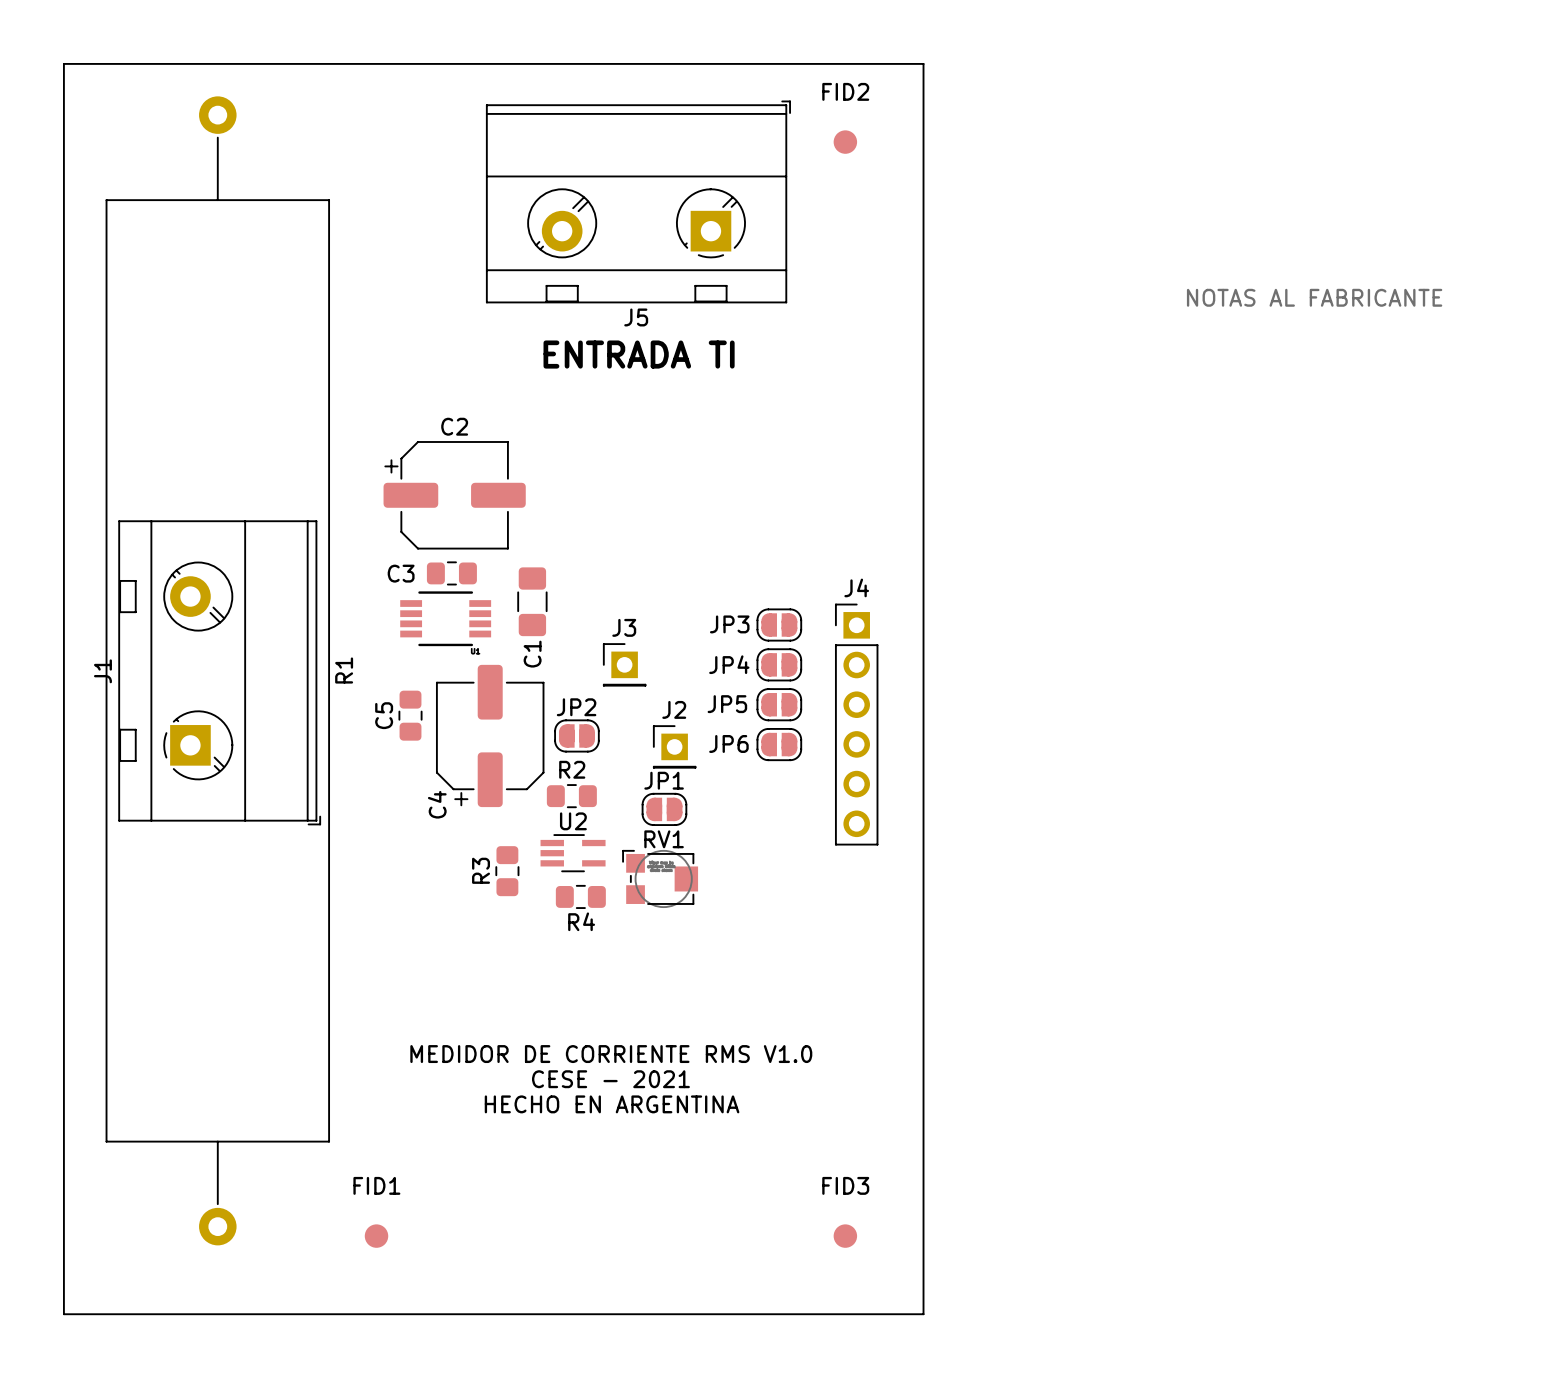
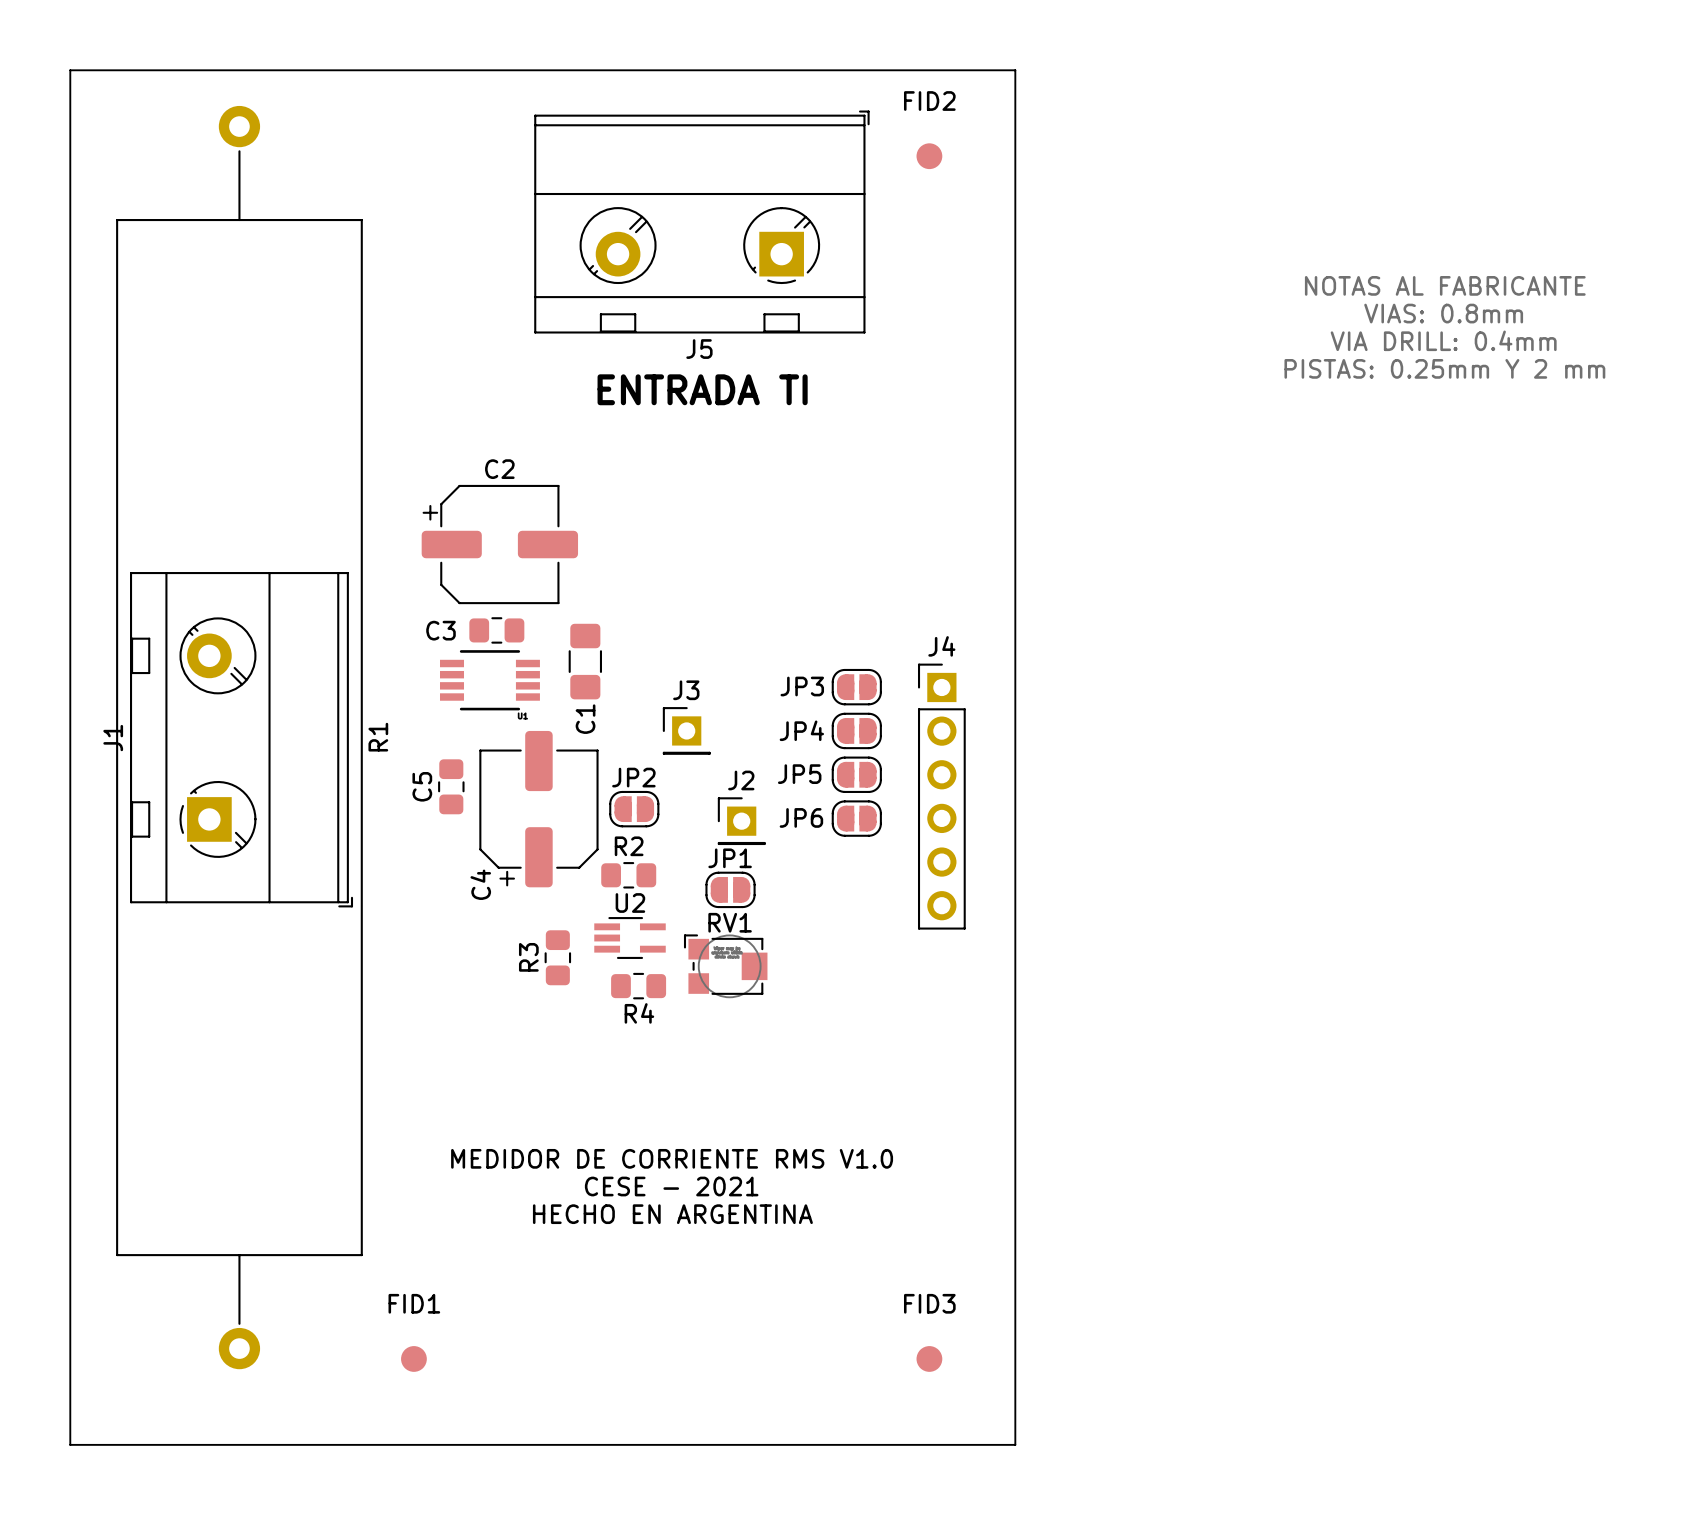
text: none -> VIAS: 0.8mm (1443, 313)
text position: NOTAS AL FABRICANTE (1314, 297) -> NOTAS AL FABRICANTE (1445, 285)
text: none -> VIA DRILL: 0.4mm (1443, 340)
text: none -> PISTAS: 0.25mm Y 2 mm (1444, 368)

